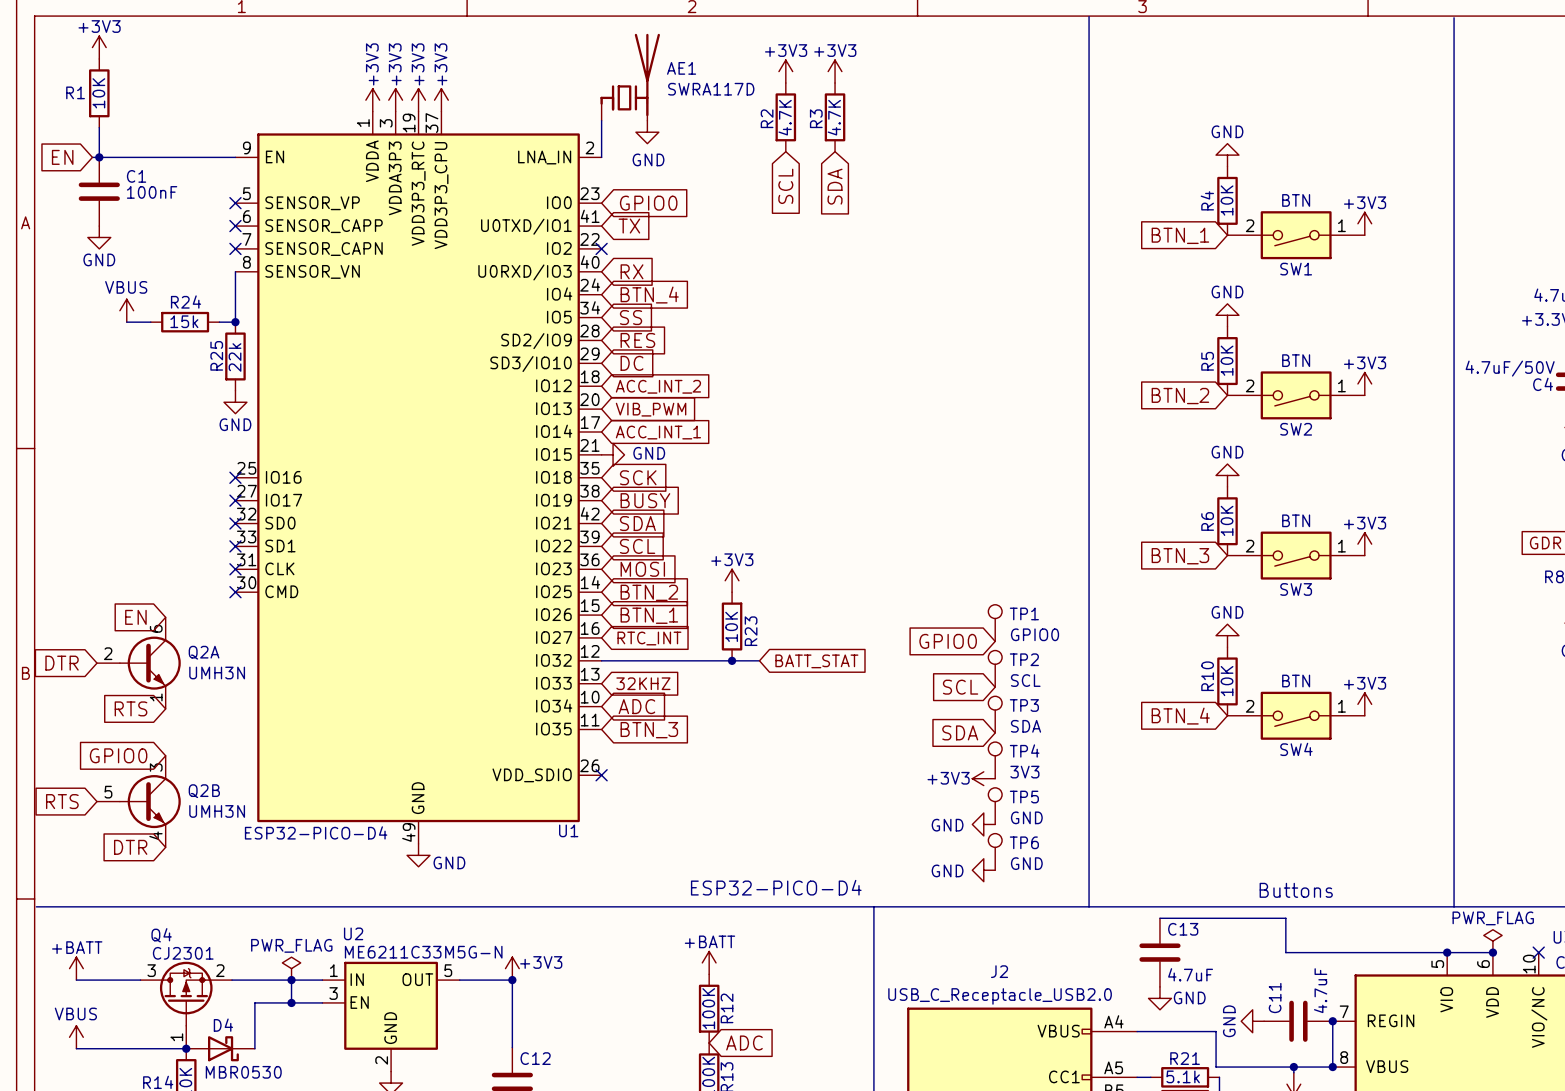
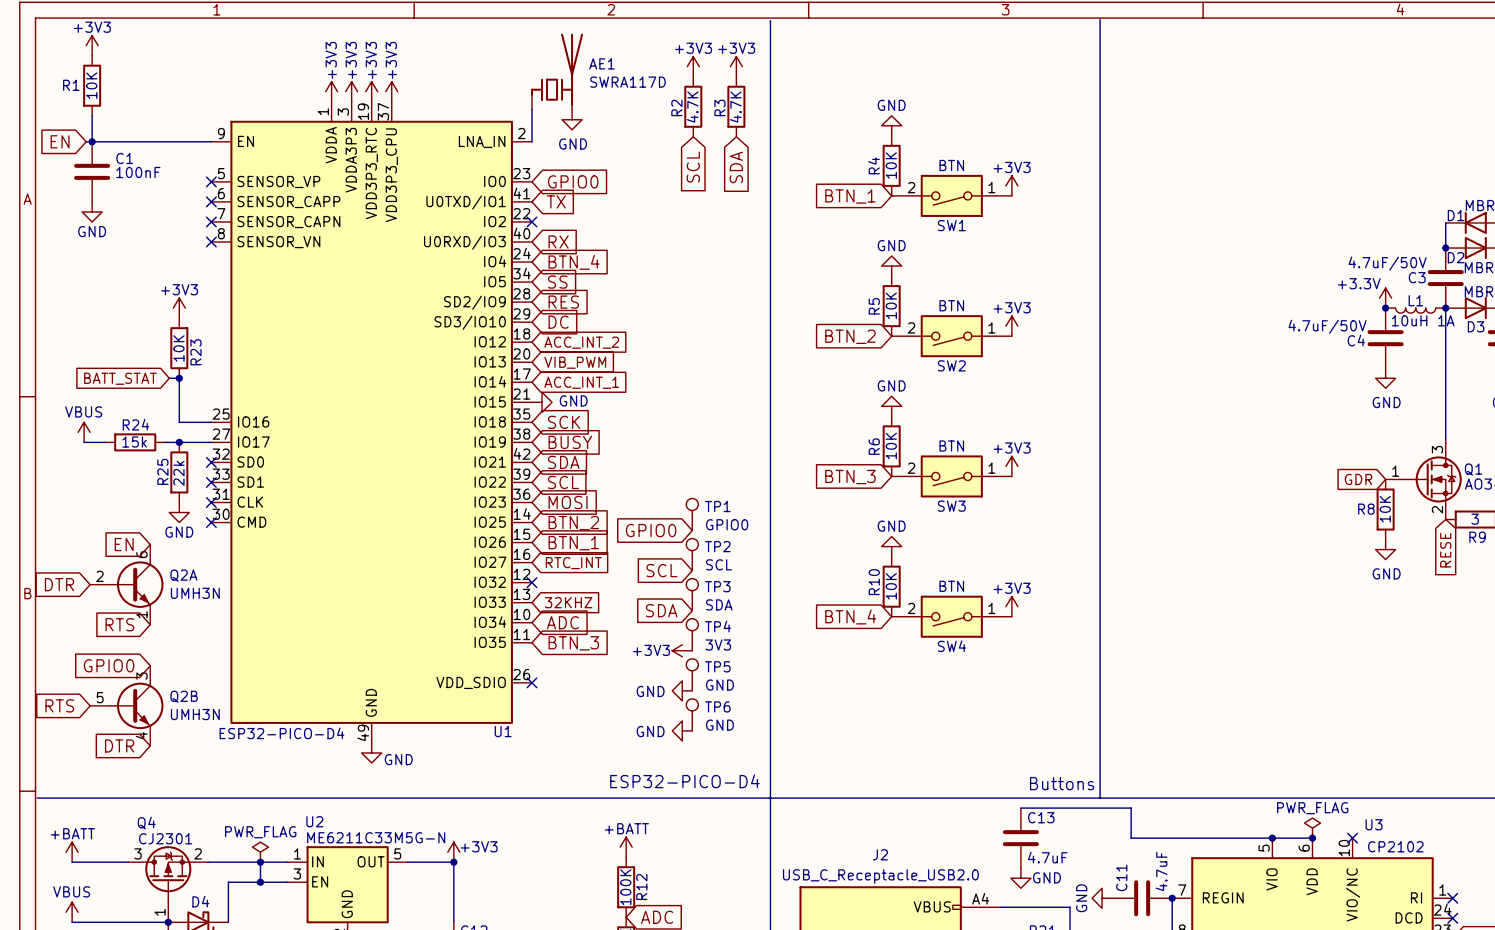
line: (1089, 16) (1089, 906) -> none
line: (1454, 17) (1454, 906) -> (1100, 19) (1100, 798)
line: none -> (770, 20) (770, 798)
power symbol: none -> GND (891, 125)
power symbol: GND (1227, 155) -> none
R4 position: (1227, 200) -> (891, 165)
power symbol: none -> +3V3 (1011, 185)
power symbol: +3V3 (1364, 223) -> none
global label position: BTN_1 (1180, 235) -> BTN_1 (850, 196)
SW1 position: (1296, 235) -> (951, 195)
wire: (235, 271) (235, 322) (219, 322) -> none
no-connect mark: none -> (211, 242)
power symbol: none -> GND (891, 266)
power symbol position: VBUS (126, 310) -> VBUS (84, 432)
power symbol: GND (1227, 315) -> none
wire: (126, 322) (150, 322) -> (84, 442) (105, 442)
R24 position: (185, 322) -> (135, 442)
junction: (235, 322) -> none
power symbol: none -> +3V3 (179, 308)
R25 position: (235, 356) -> (179, 472)
R5 position: (1227, 361) -> (891, 306)
power symbol: none -> +3V3 (1011, 326)
power symbol: +3V3 (1364, 383) -> none
SW2 position: (1296, 395) -> (951, 336)
global label position: BTN_2 (1180, 396) -> BTN_2 (850, 336)
power symbol position: GND (235, 402) -> GND (179, 512)
global label: none -> BATT_STAT (120, 378)
wire: none -> (169, 378) (179, 378) (179, 422) (211, 422)
junction: none -> (179, 378)
power symbol: none -> GND (891, 406)
power symbol: GND (1227, 475) -> none
no-connect mark: (235, 477) -> none
wire: none -> (165, 442) (211, 442)
junction: none -> (179, 442)
no-connect mark: (235, 500) -> none
R6 position: (1227, 521) -> (891, 446)
power symbol: none -> +3V3 (1011, 466)
power symbol: +3V3 (1364, 544) -> none
SW3 position: (1296, 555) -> (951, 476)
global label position: BTN_3 (1180, 556) -> BTN_3 (850, 477)
power symbol: +3V3 (732, 580) -> none
power symbol: none -> GND (891, 546)
TP1 position: (995, 623) -> (692, 514)
R23 position: (732, 626) -> (179, 348)
power symbol: GND (1227, 635) -> none
global label position: GPIO0 (948, 641) -> GPIO0 (651, 530)
wire: (601, 660) (759, 660) -> none
no-connect mark: none -> (531, 582)
junction: (732, 660) -> none
global label: BATT_STAT (816, 661) -> none
TP2 position: (995, 668) -> (692, 554)
R10 position: (1227, 681) -> (891, 586)
global label position: SCL (960, 687) -> SCL (661, 570)
power symbol: none -> +3V3 (1011, 606)
power symbol: +3V3 (1364, 704) -> none
TP3 position: (995, 714) -> (692, 594)
SW4 position: (1296, 715) -> (951, 616)
global label position: BTN_4 (1180, 716) -> BTN_4 (850, 617)
global label position: SDA (960, 732) -> SDA (661, 610)
power symbol: none -> +3V3 (682, 650)
TP4 position: (995, 760) -> (692, 634)
power symbol: +3V3 (983, 778) -> none
power symbol: none -> GND (682, 690)
TP5 position: (995, 806) -> (692, 674)
power symbol: GND (983, 824) -> none
power symbol: none -> GND (682, 730)
TP6 position: (995, 851) -> (692, 714)
power symbol: GND (983, 870) -> none
text position: Buttons (1296, 890) -> Buttons (1062, 783)

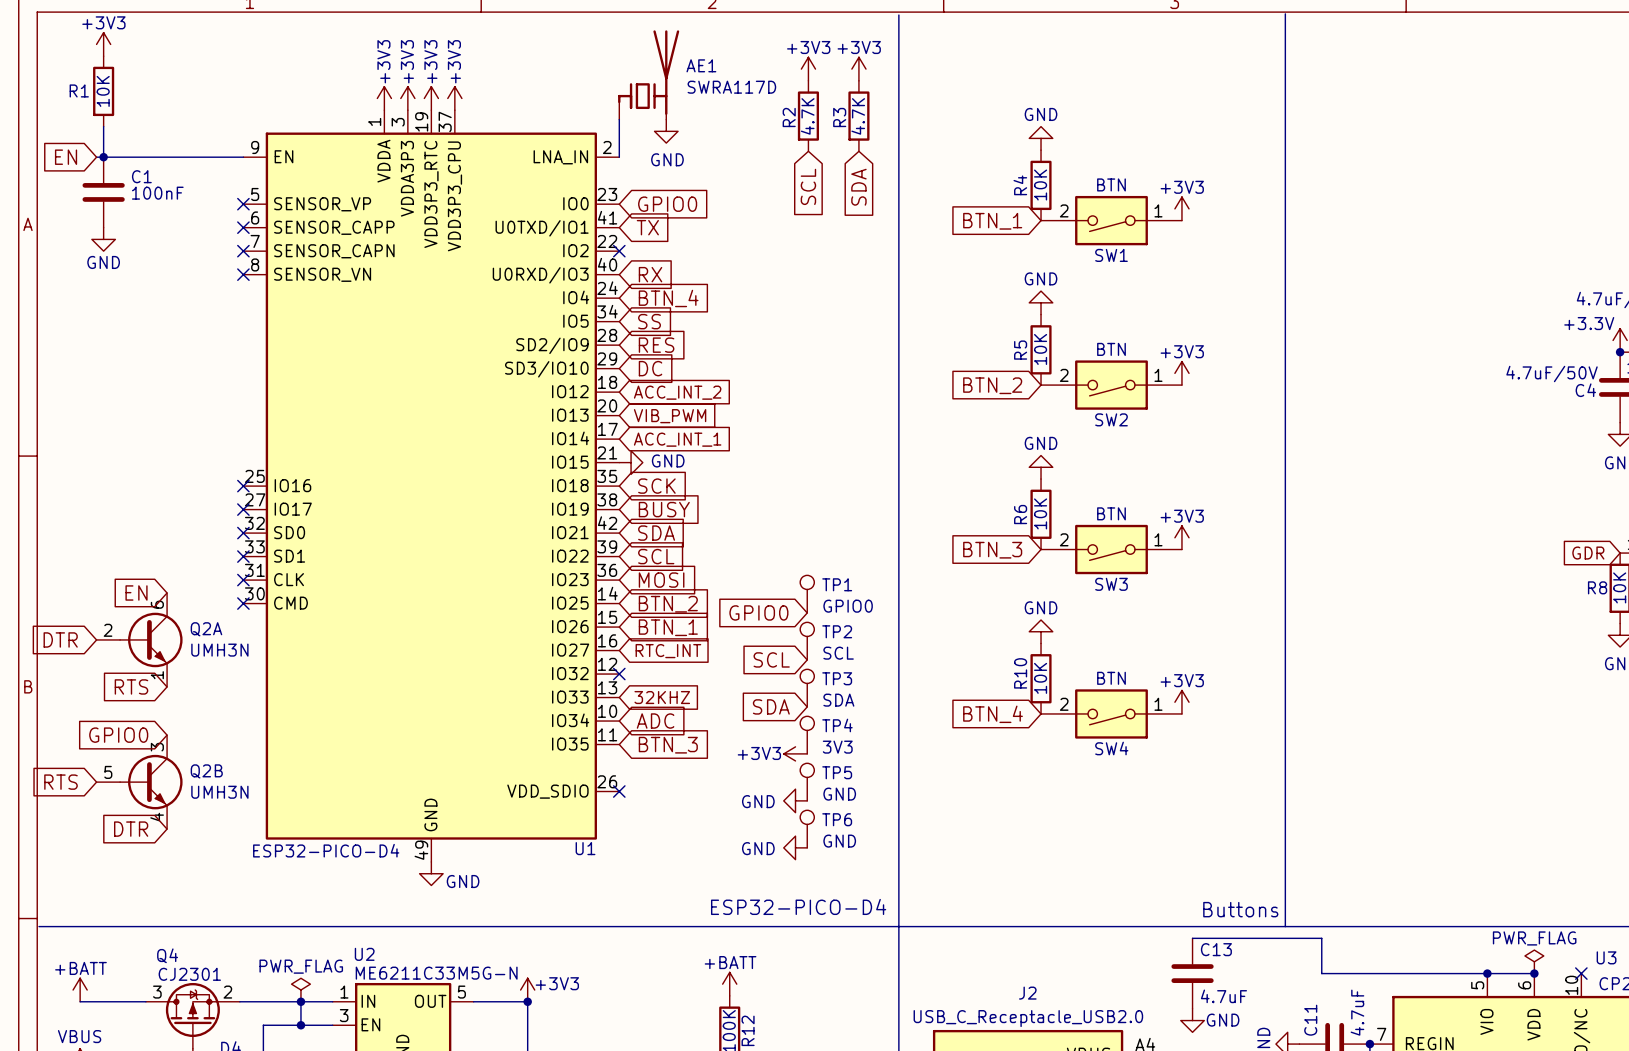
power symbol: +3V3 (179, 308) -> none
R23: 10K (179, 348) -> none
global label: BATT_STAT (120, 378) -> none
wire: (169, 378) (179, 378) (179, 422) (211, 422) -> none
junction: (179, 378) -> none
no-connect mark: none -> (243, 486)
power symbol: VBUS (84, 432) -> none
wire: (84, 442) (105, 442) -> none
R24: 15k (135, 442) -> none
wire: (165, 442) (211, 442) -> none
junction: (179, 442) -> none
no-connect mark: none -> (243, 509)
R25: 22k (179, 472) -> none
power symbol: GND (179, 512) -> none
global label position: EN (124, 544) -> EN (136, 592)
global label position: DTR (59, 584) -> DTR (60, 639)
Q2A position: (126, 584) -> (139, 639)
global label position: RTS (119, 624) -> RTS (131, 686)
global label position: GPIO0 (109, 665) -> GPIO0 (118, 735)
global label position: RTS (59, 705) -> RTS (61, 782)
Q2B position: (126, 705) -> (139, 782)
global label position: DTR (119, 745) -> DTR (131, 829)

